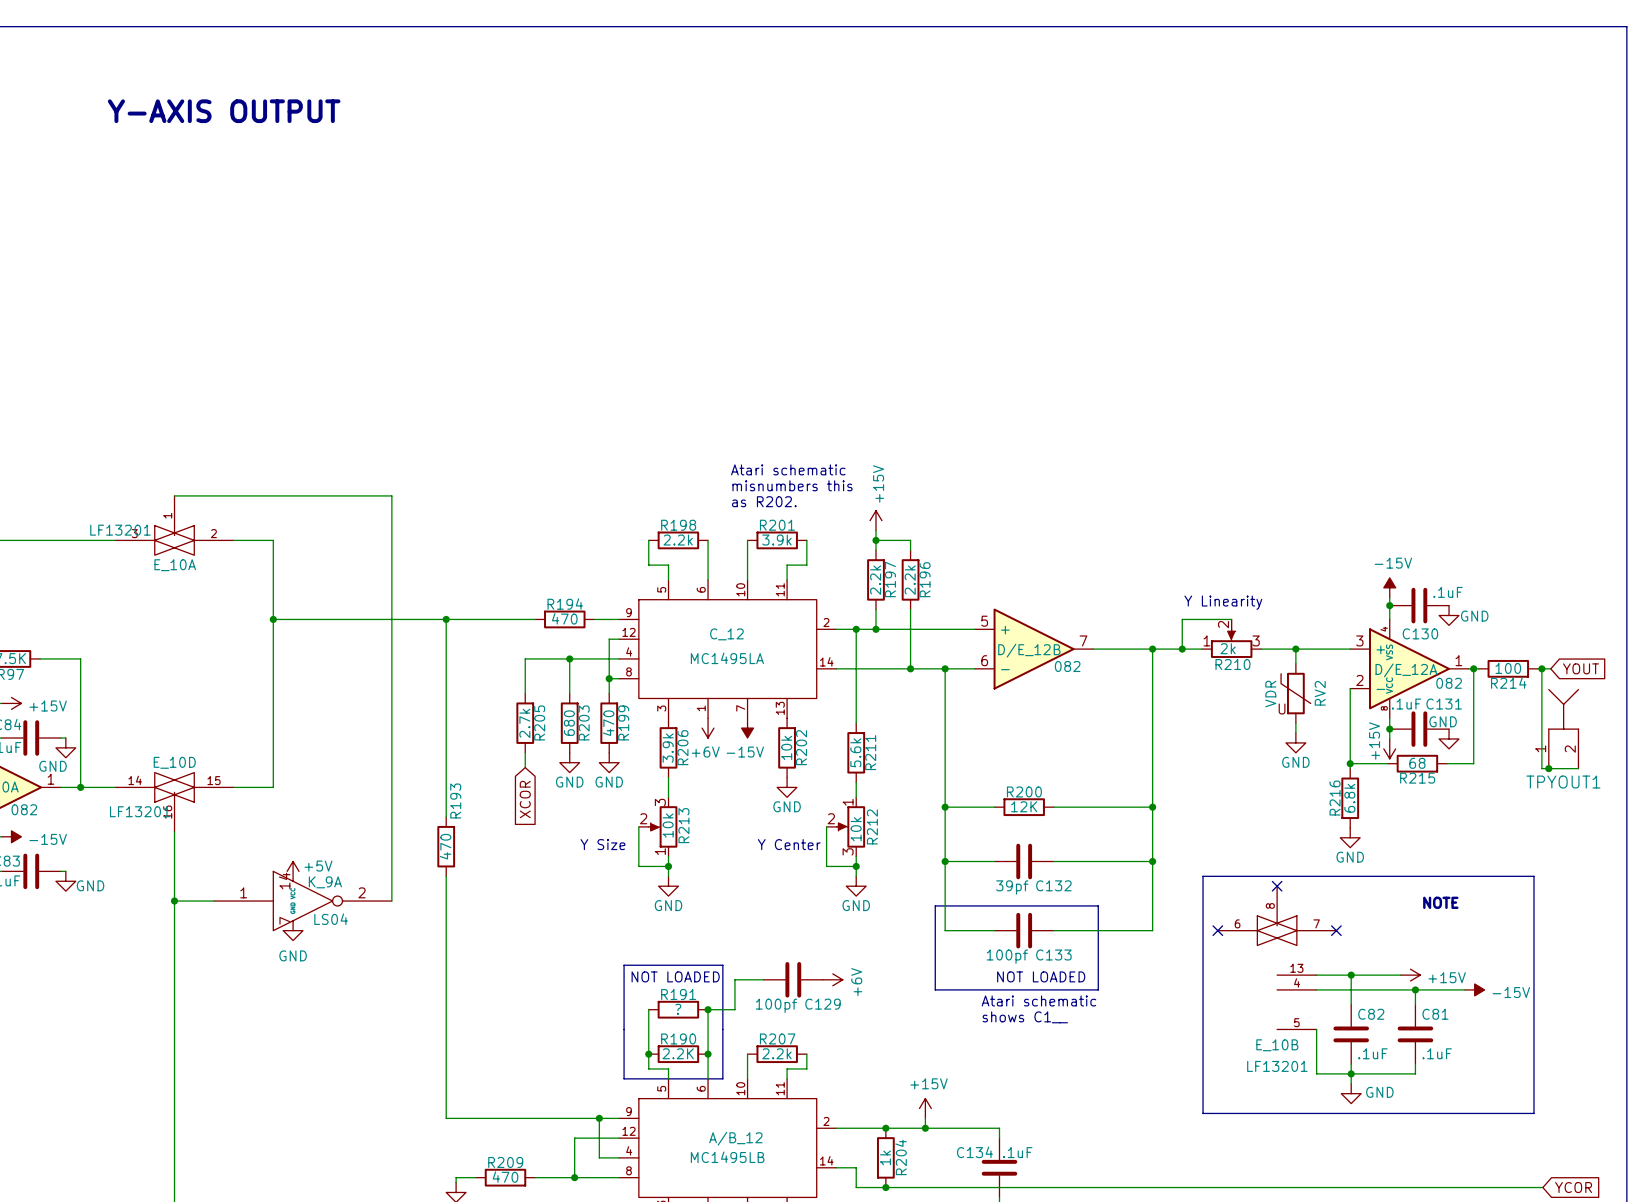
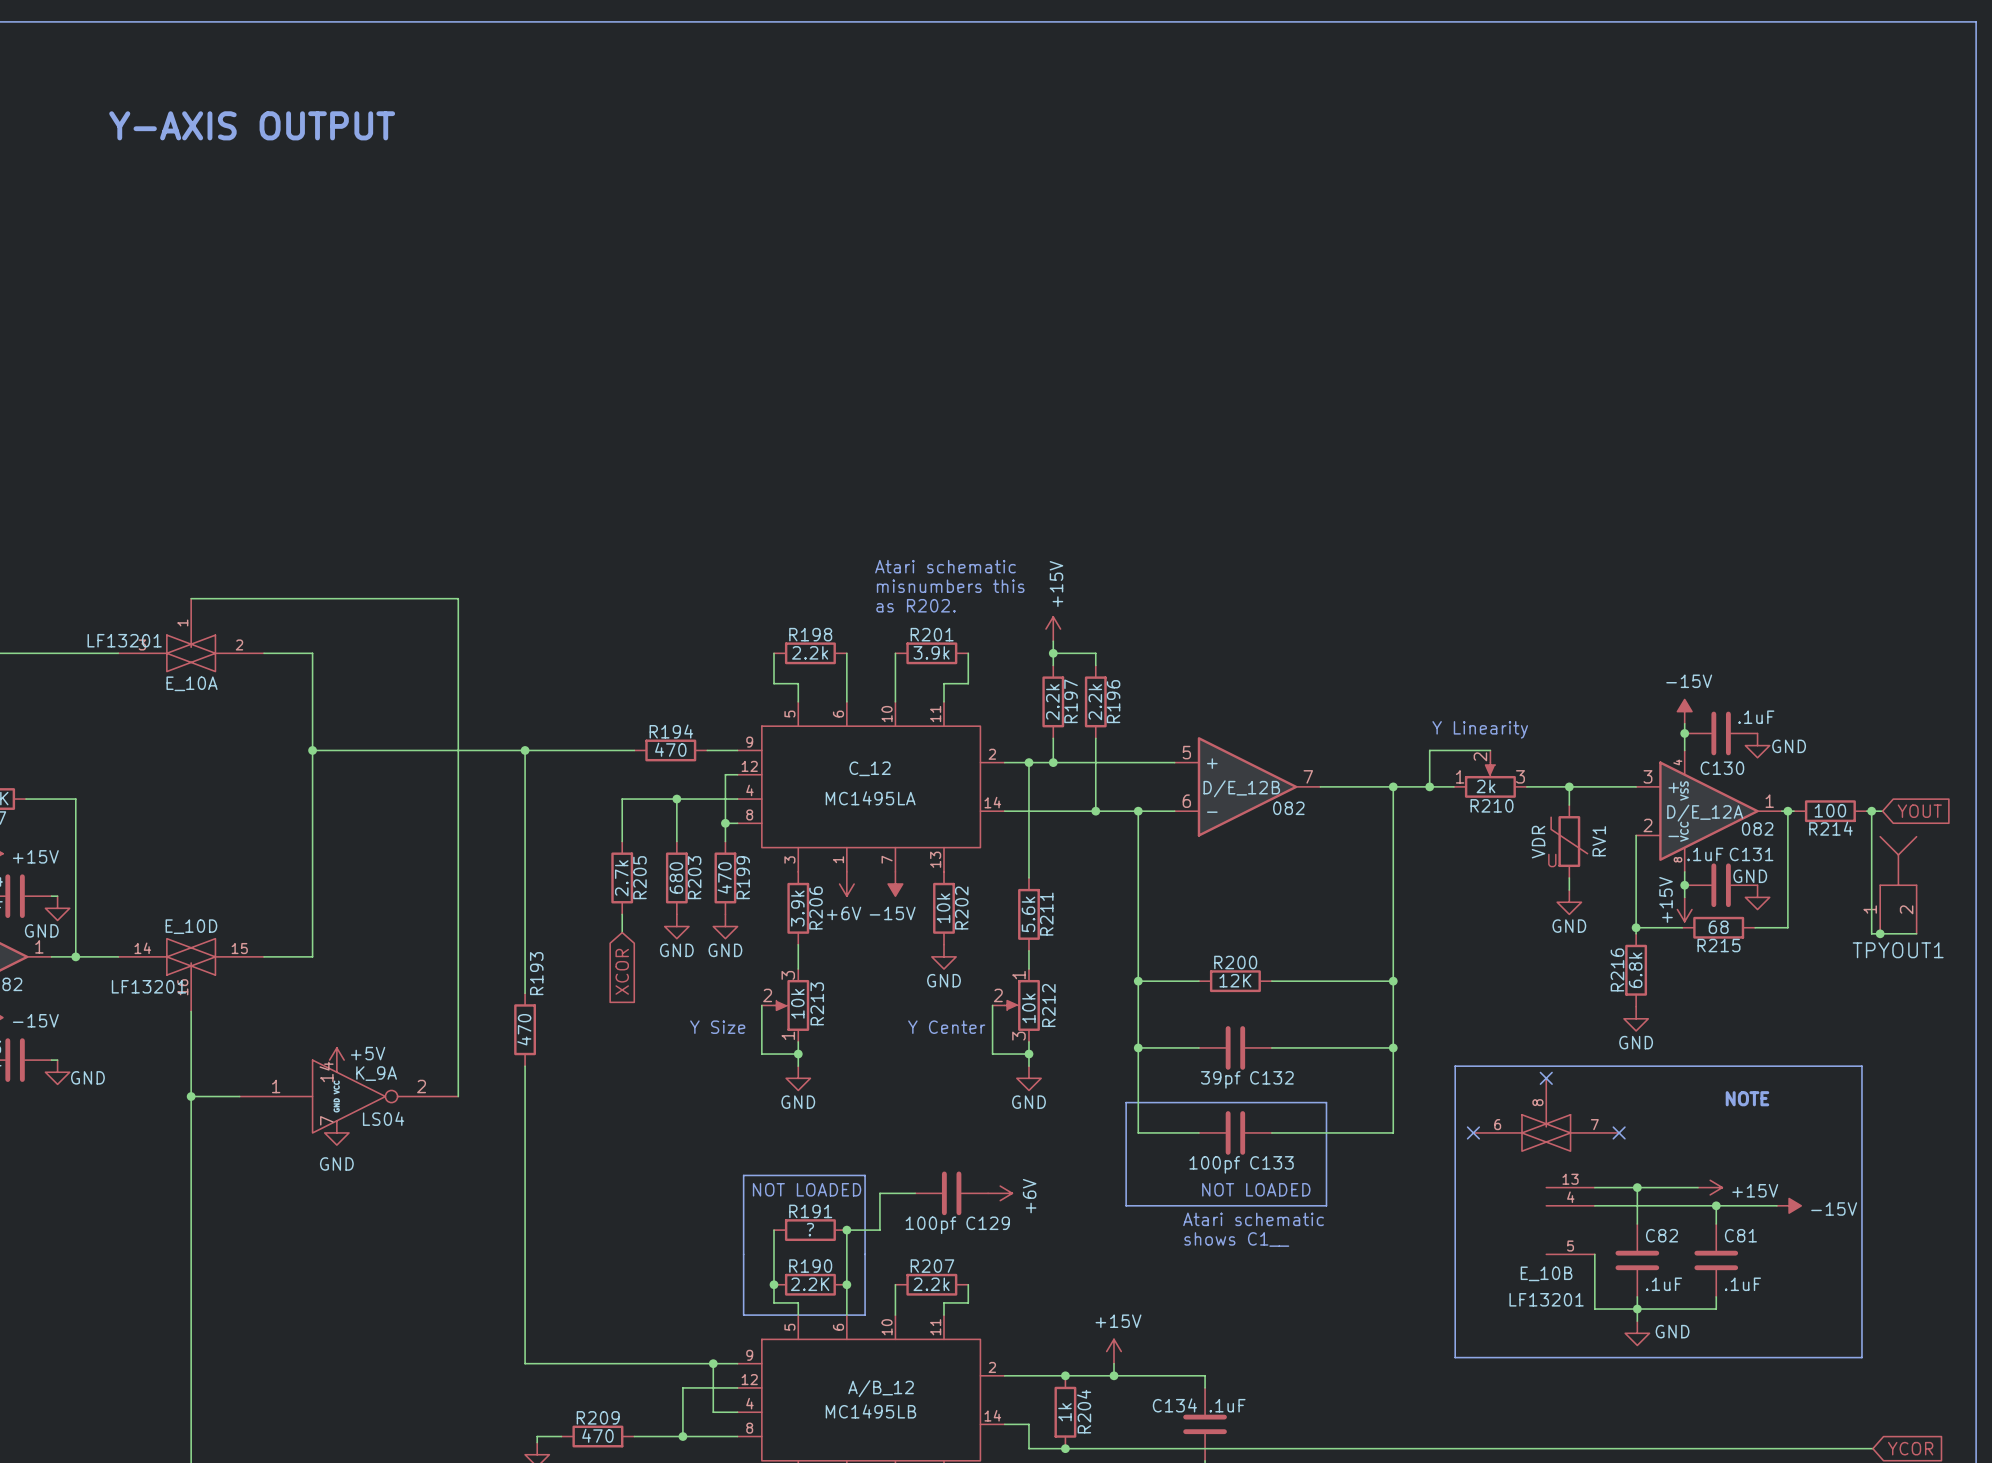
RV2 name: RV2 (1320, 693) -> RV1 (1599, 841)

